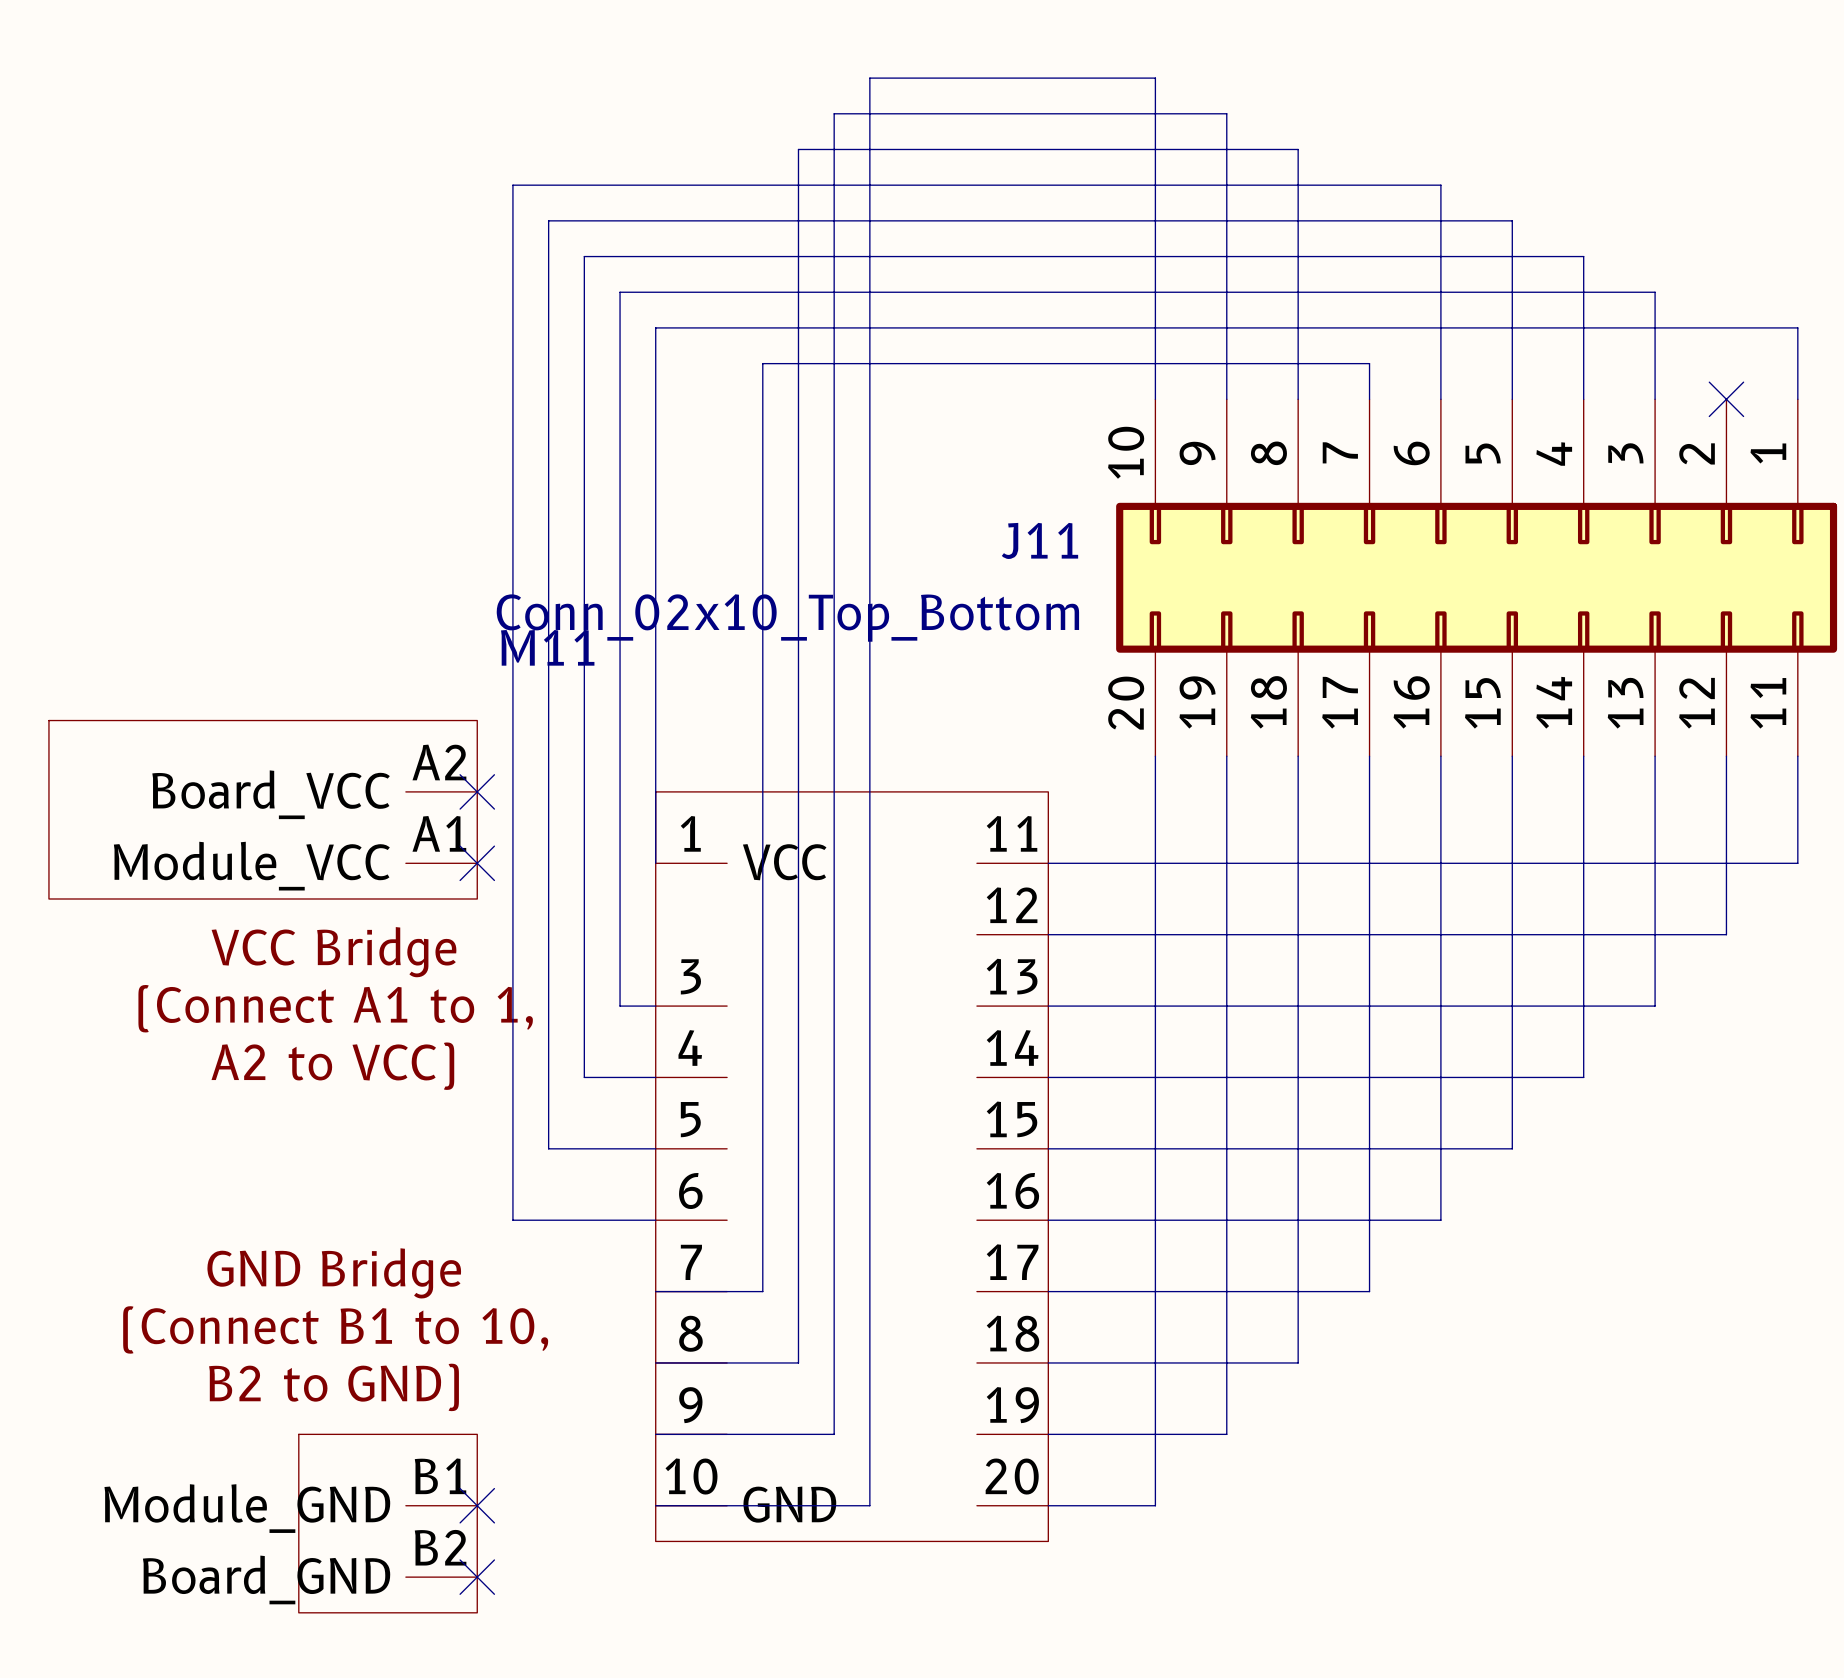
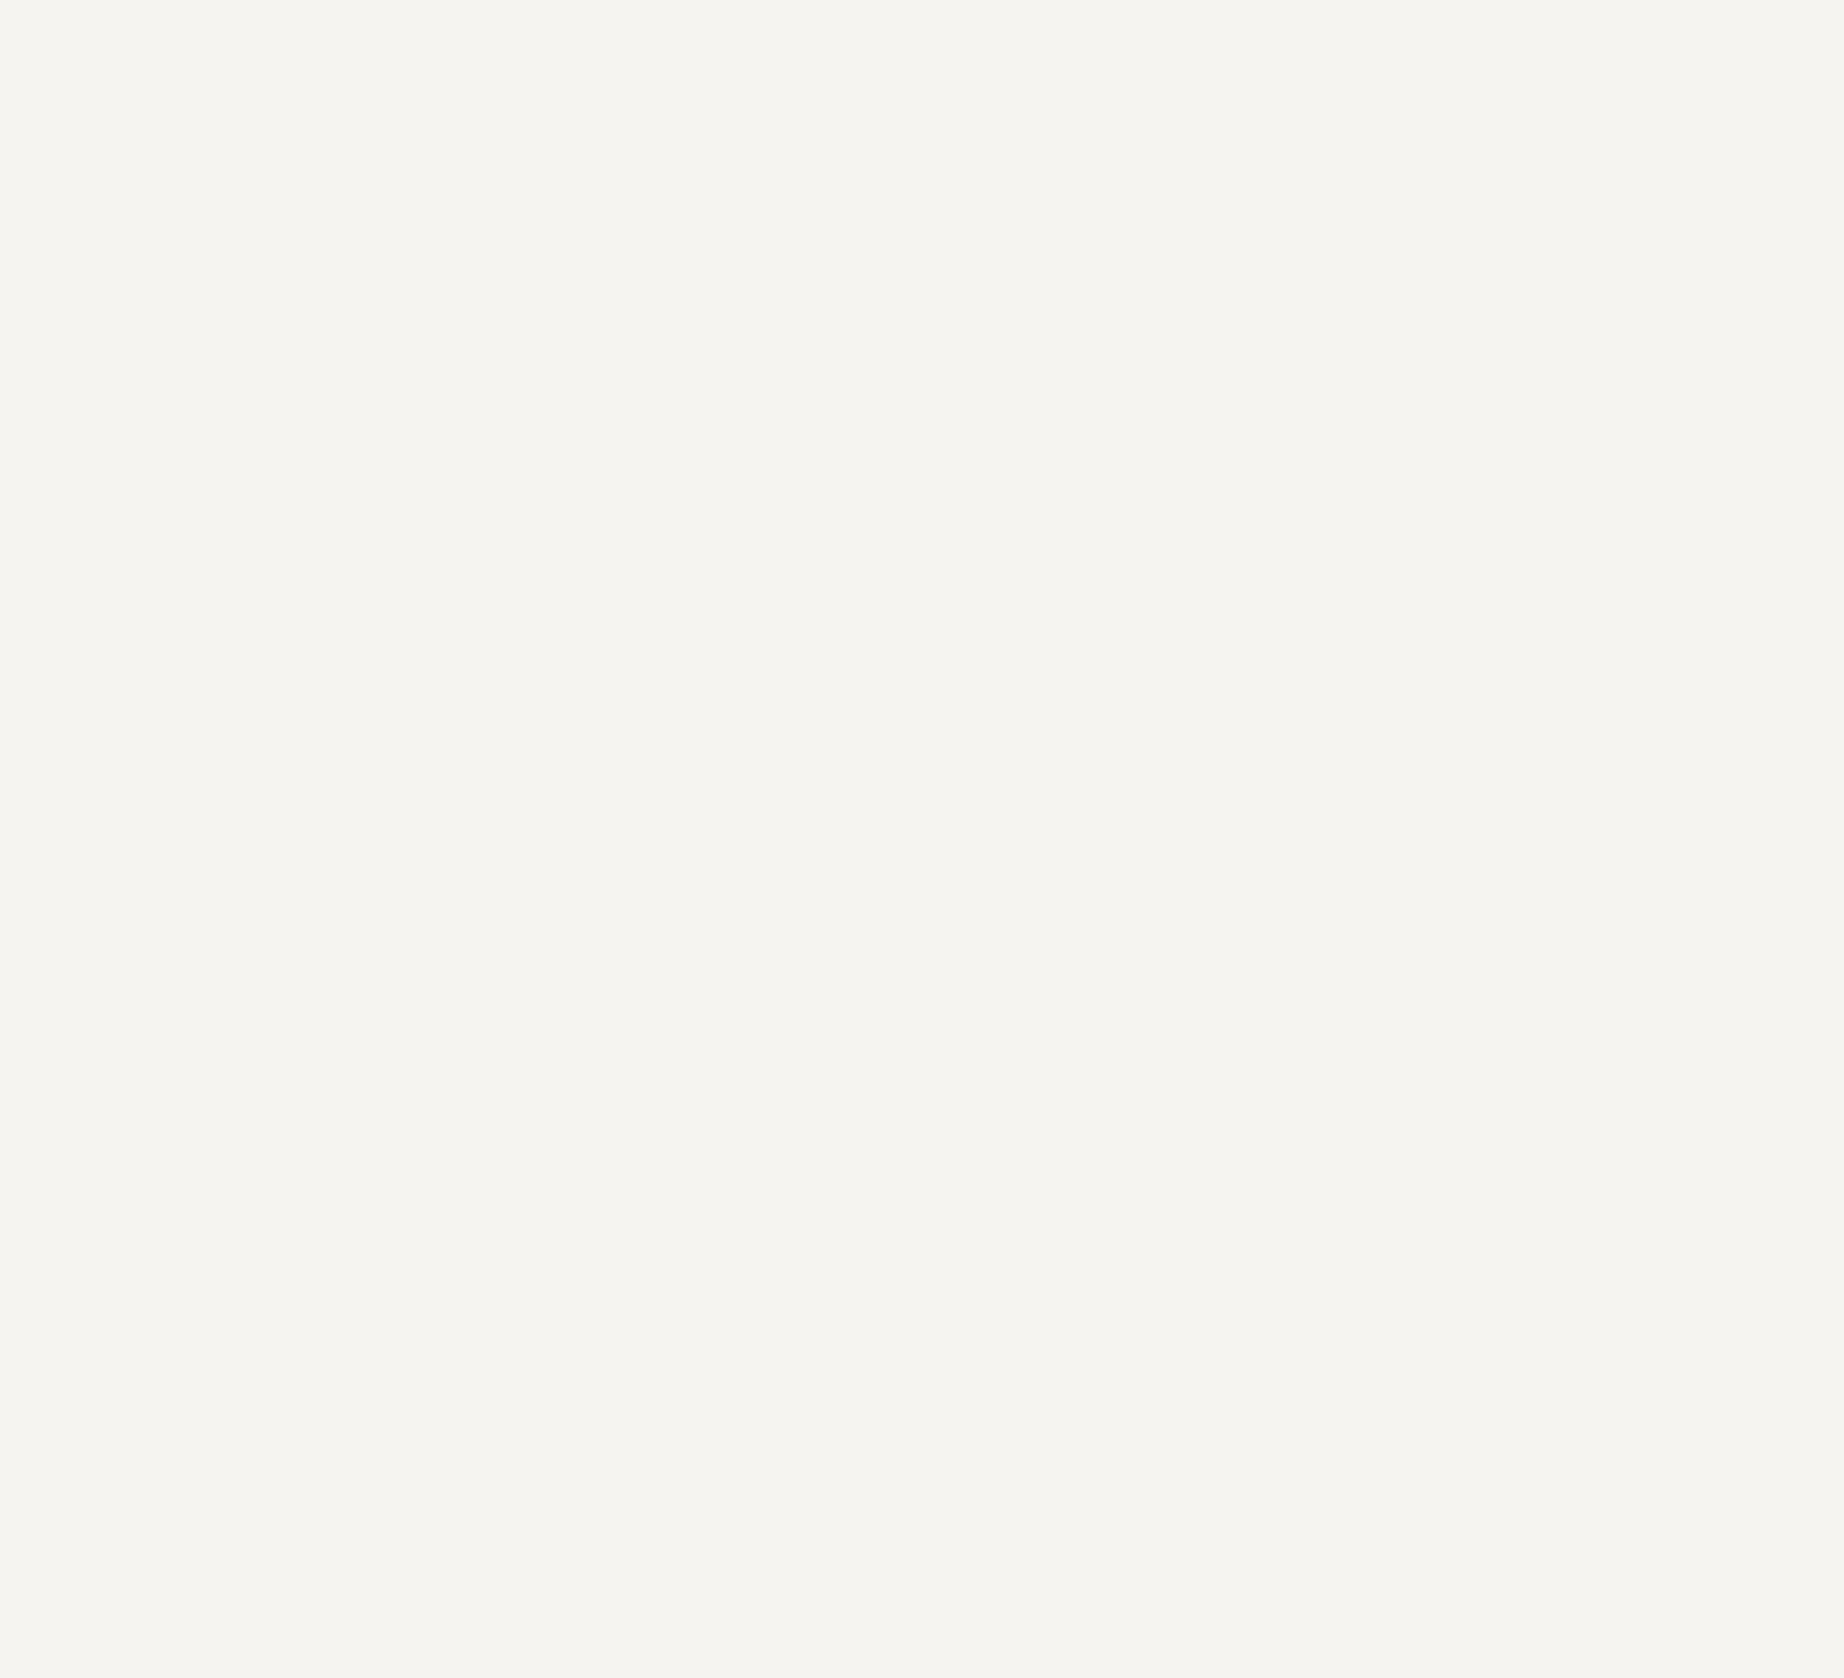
wire: (1155, 399) (1155, 78) (869, 78) (869, 1505) (655, 1505) -> none
wire: (1226, 399) (1226, 113) (834, 113) (834, 1434) (655, 1434) -> none
wire: (1298, 399) (1298, 149) (798, 149) (798, 1362) (655, 1362) -> none
wire: (1369, 399) (1369, 363) (762, 363) (762, 1291) (655, 1291) -> none
wire: (1440, 399) (1440, 185) (512, 185) (512, 1220) (655, 1220) -> none
wire: (1512, 399) (1512, 220) (548, 220) (548, 1148) (655, 1148) -> none
wire: (1583, 399) (1583, 256) (584, 256) (584, 1077) (655, 1077) -> none
wire: (1655, 399) (1655, 292) (620, 292) (620, 1006) (655, 1006) -> none
no-connect mark: (1726, 399) -> none
wire: (1797, 399) (1797, 327) (655, 327) (655, 863) -> none
J11: Conn_02x10_Top_Bottom (1476, 577) -> none
wire: (1155, 756) (1155, 1505) (1048, 1505) -> none
wire: (1226, 756) (1226, 1434) (1048, 1434) -> none
wire: (1298, 756) (1298, 1362) (1048, 1362) -> none
wire: (1369, 756) (1369, 1291) (1048, 1291) -> none
wire: (1440, 756) (1440, 1220) (1048, 1220) -> none
wire: (1512, 756) (1512, 1148) (1048, 1148) -> none
wire: (1583, 756) (1583, 1077) (1048, 1077) -> none
wire: (1655, 756) (1655, 1006) (1048, 1006) -> none
wire: (1726, 756) (1726, 934) (1048, 934) -> none
wire: (1797, 756) (1797, 863) (1048, 863) -> none
no-connect mark: (477, 791) -> none
no-connect mark: (477, 863) -> none
M11: (548, 1166) -> none
no-connect mark: (477, 1505) -> none
no-connect mark: (477, 1577) -> none

